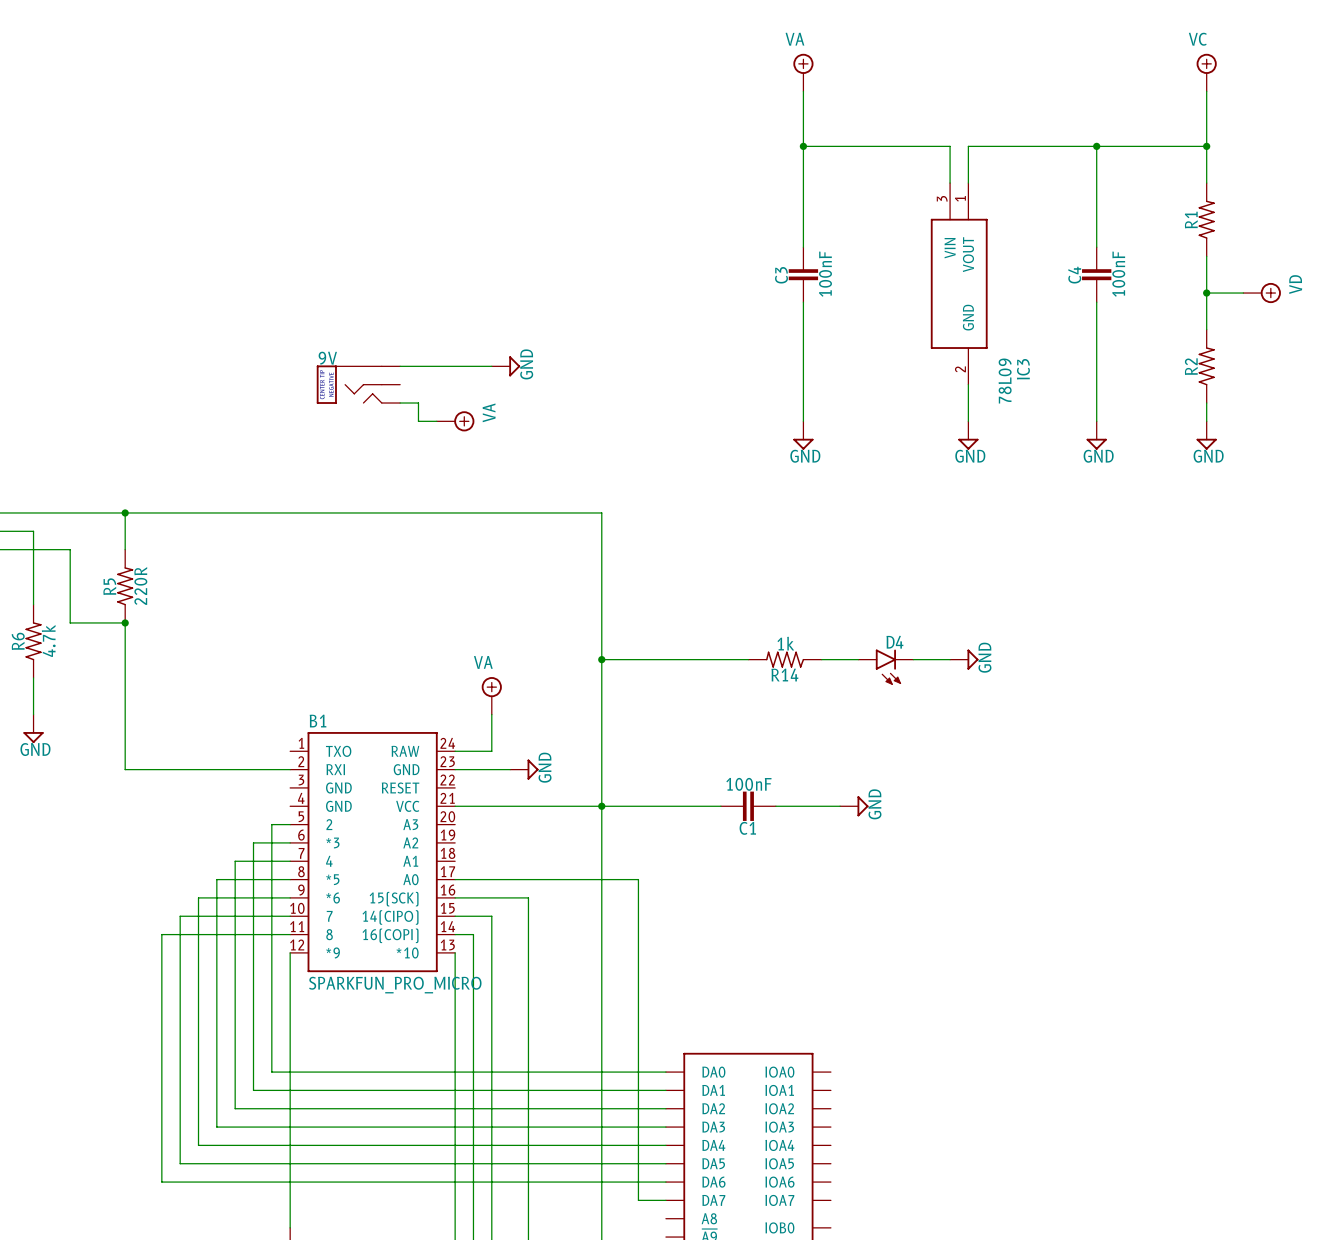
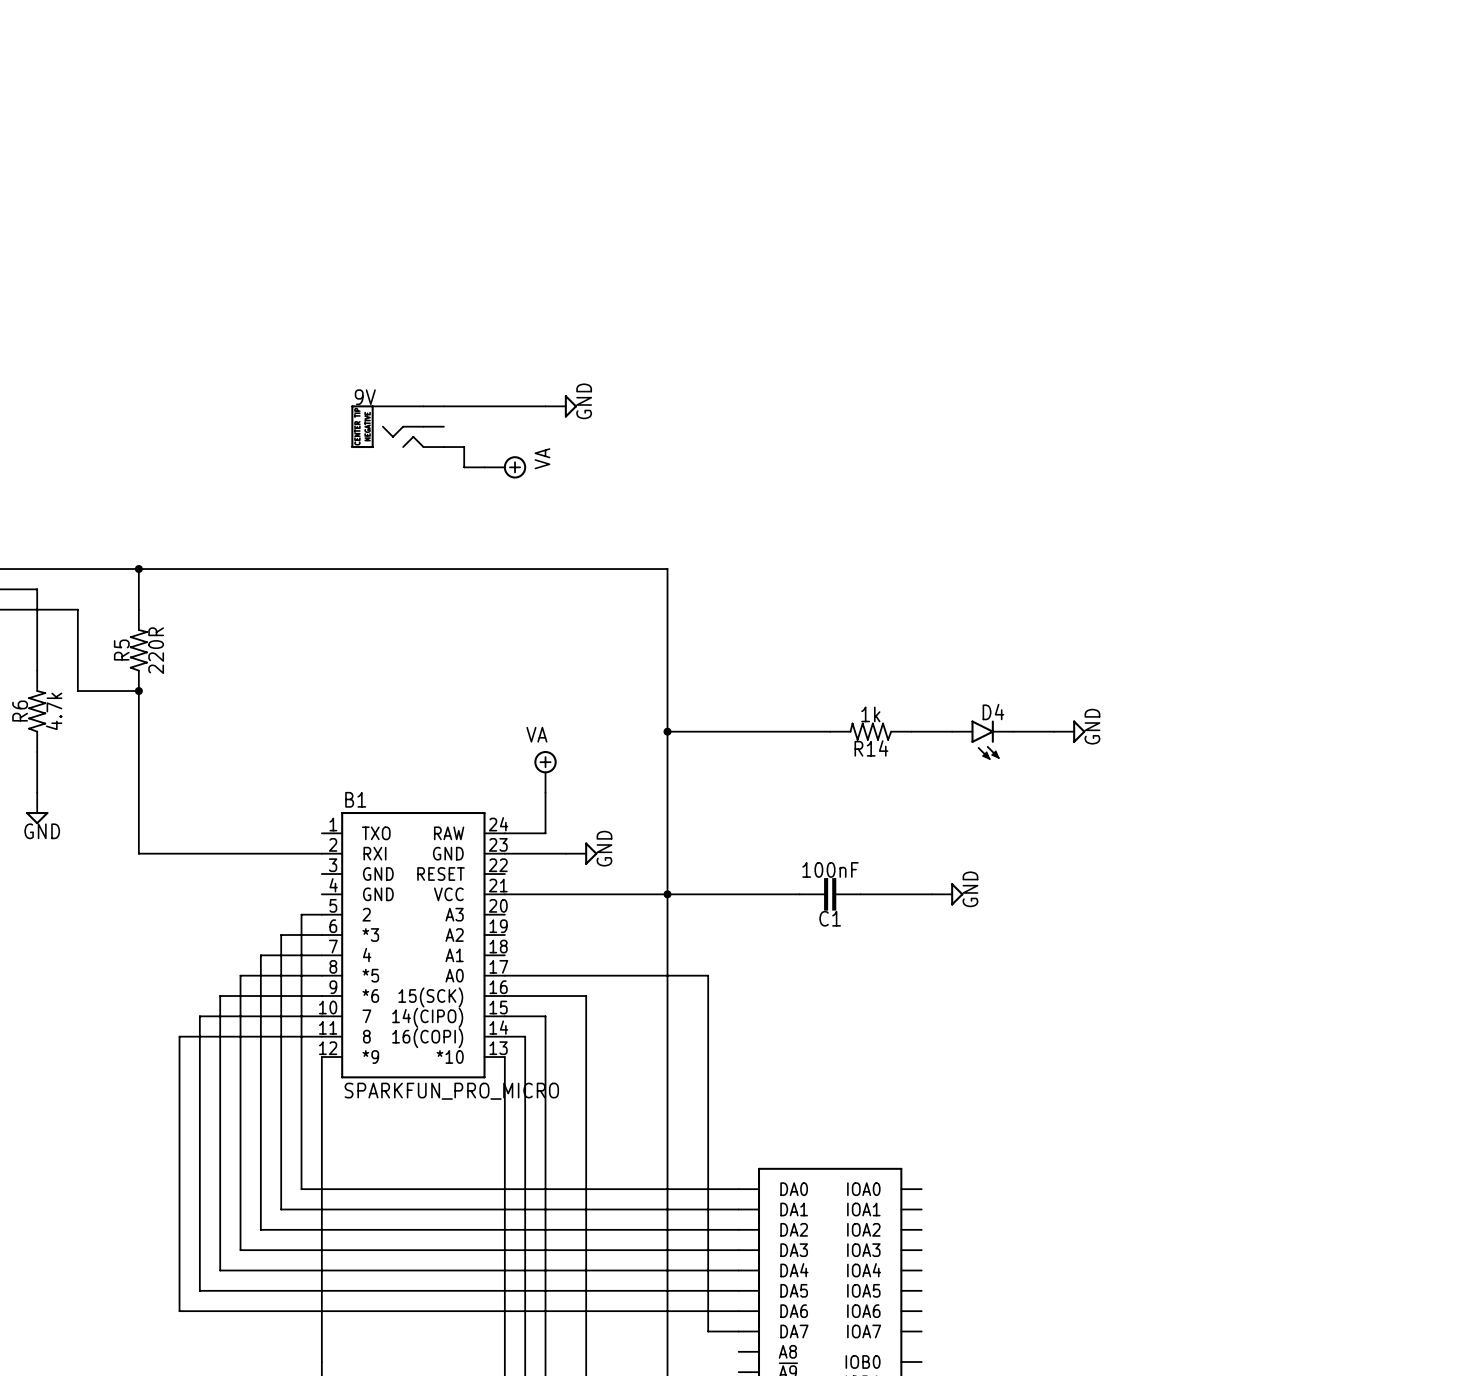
power symbol: VA (803, 72) -> none
power symbol: VC (1206, 72) -> none
wire: (803, 91) (803, 247) -> none
wire: (1206, 91) (1206, 183) -> none
wire: (803, 146) (950, 146) (950, 183) -> none
junction: (803, 146) -> none
wire: (1096, 146) (1096, 247) -> none
junction: (1096, 146) -> none
wire: (1206, 146) (968, 146) (968, 183) -> none
junction: (1206, 146) -> none
R1: (1206, 219) -> none
wire: (1206, 256) (1206, 329) -> none
C3: 100nF (803, 274) -> none
C4: 100nF (1096, 274) -> none
IC3: 78L09 (959, 283) -> none
wire: (1206, 293) (1243, 293) -> none
junction: (1206, 293) -> none
power symbol: VD (1262, 293) -> none
wire: (803, 302) (803, 421) -> none
wire: (1096, 302) (1096, 421) -> none
R2: (1206, 366) -> none
wire: (968, 384) (968, 421) -> none
wire: (1206, 403) (1206, 421) -> none
power symbol: GND (803, 435) -> none
power symbol: GND (968, 435) -> none
power symbol: GND (1096, 435) -> none
power symbol: GND (1206, 435) -> none

